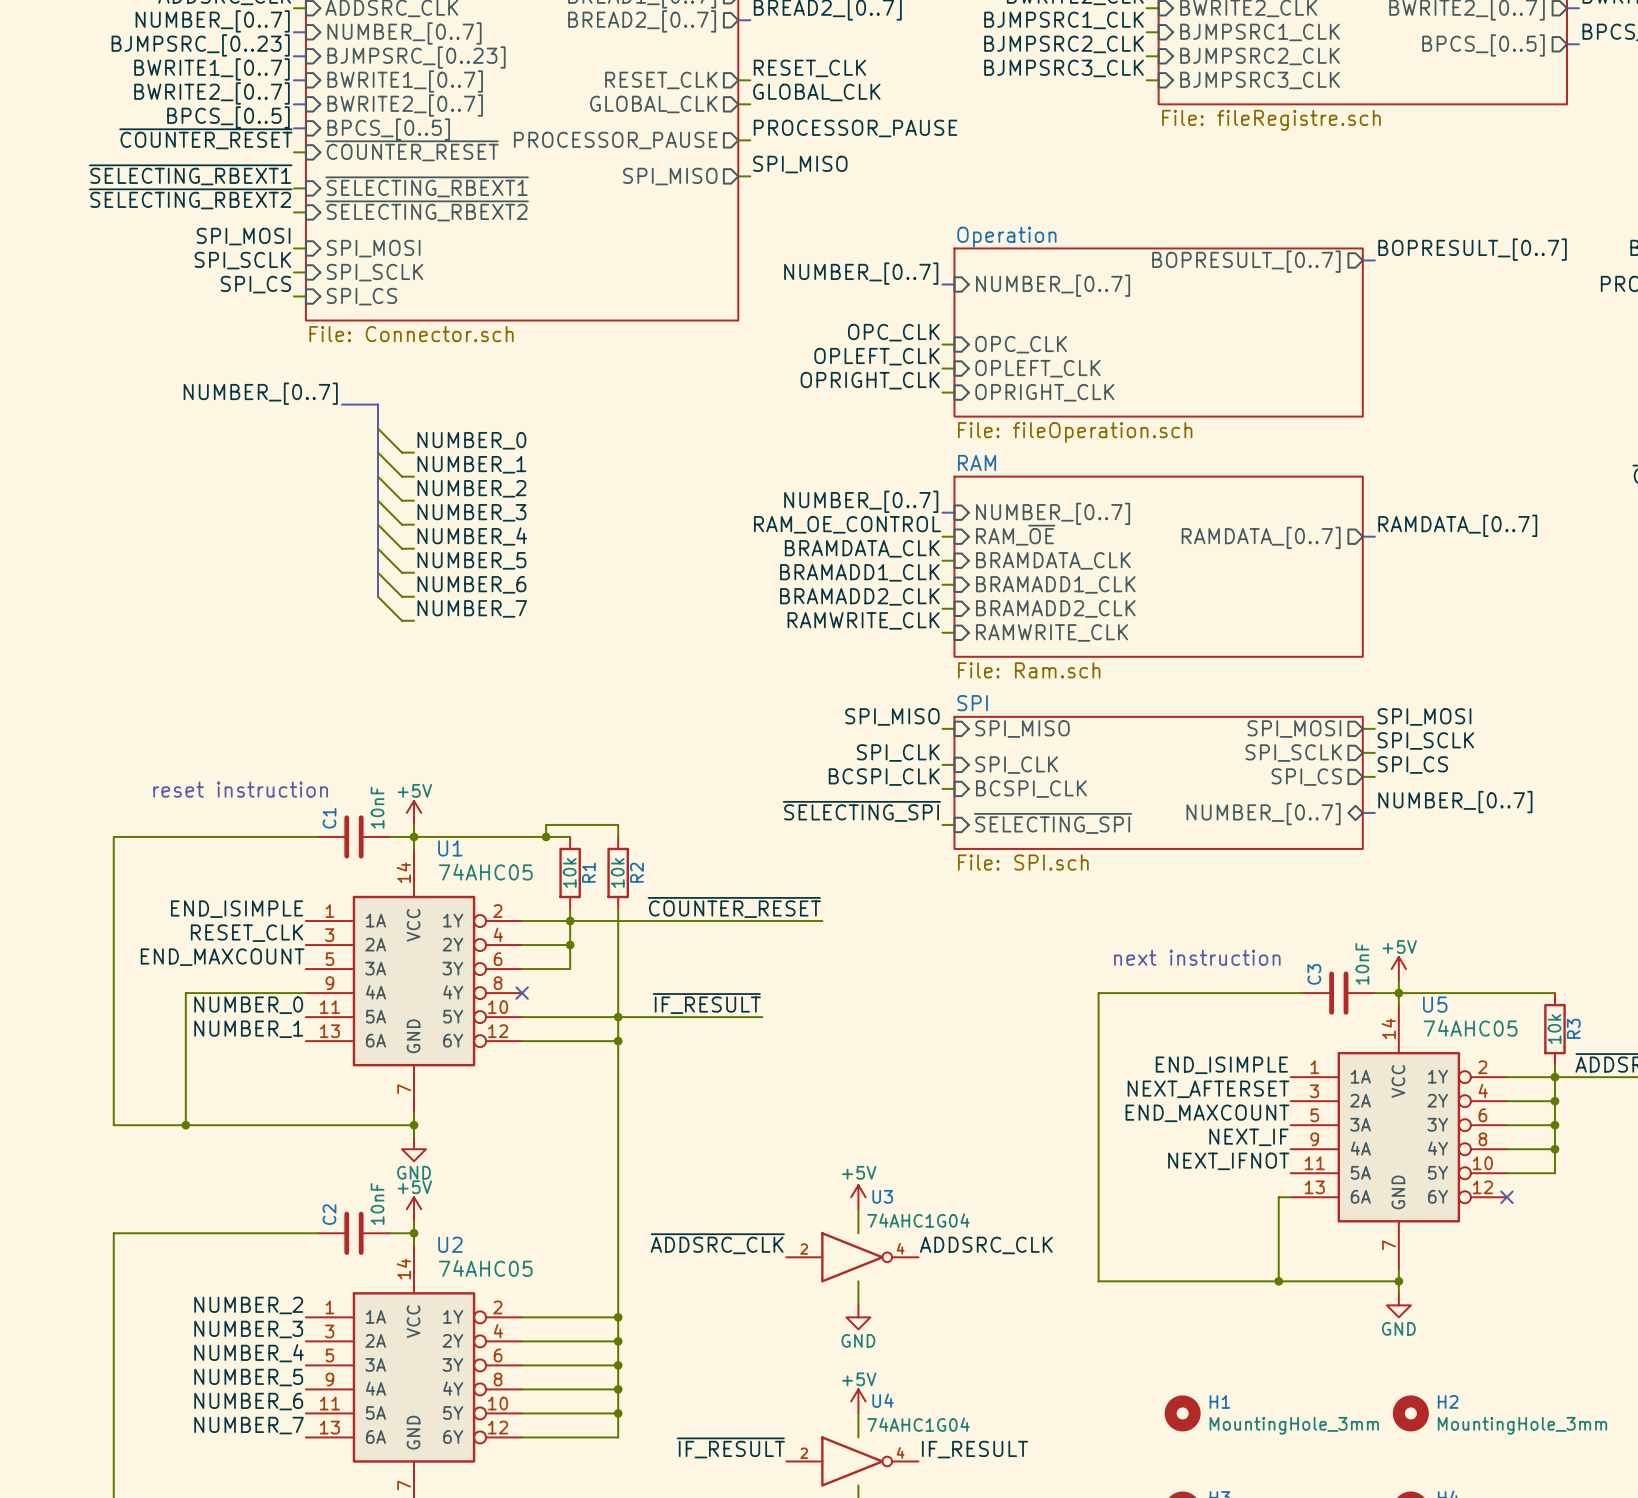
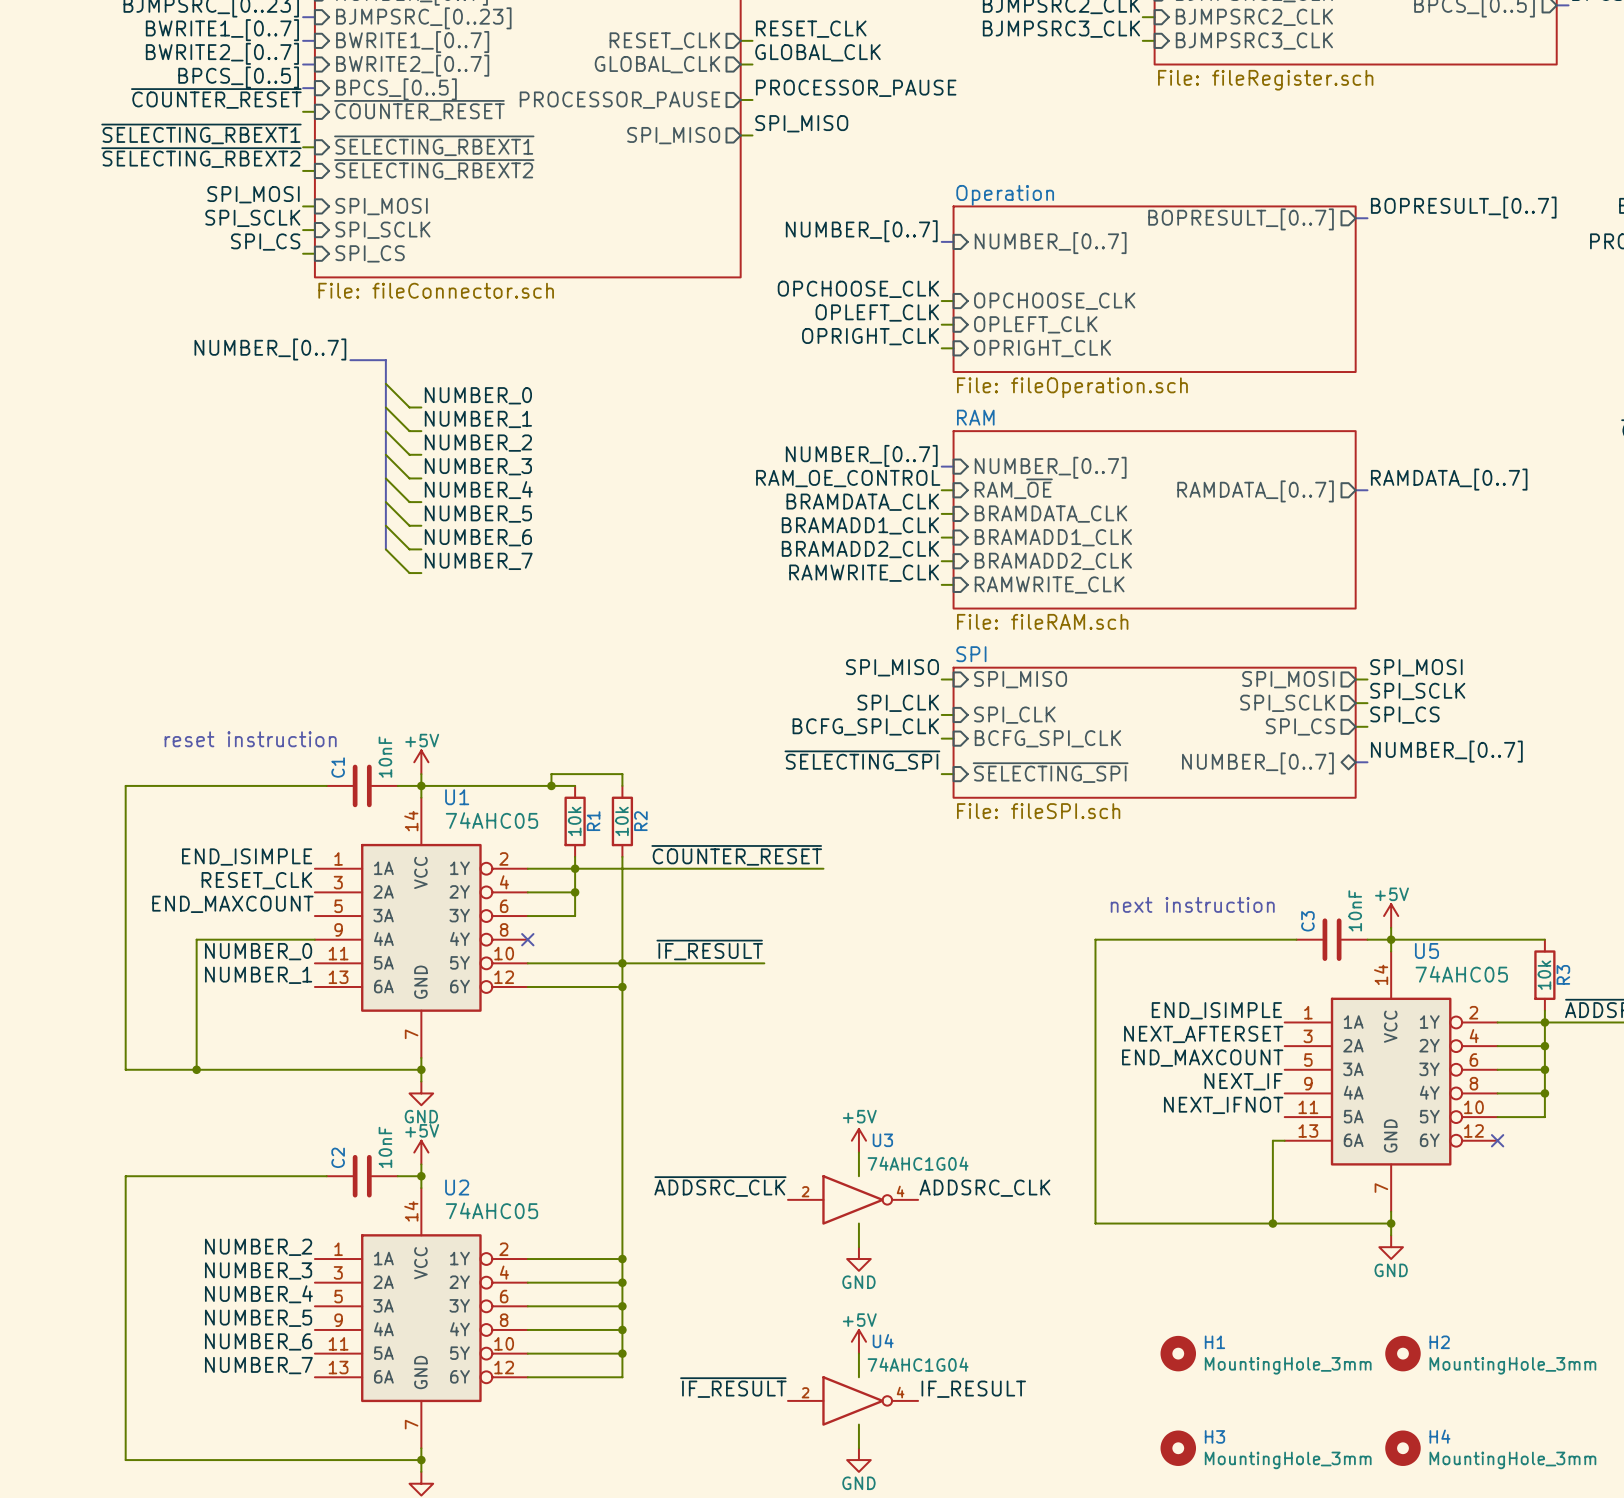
sheet value: File: fileRegistre.sch (1271, 120) -> File: fileRegister.sch (1265, 80)
label: OPC_CLK (893, 332) -> OPCHOOSE_CLK (858, 289)
sheet value: File: Connector.sch (411, 334) -> File: fileConnector.sch (436, 290)
sheet pin: OPC_CLK (1021, 344) -> OPCHOOSE_CLK (1054, 301)
sheet RAM value: File: Ram.sch (1029, 670) -> File: fileRAM.sch (1042, 621)
label: BCSPI_CLK (884, 777) -> BCFG_SPI_CLK (865, 726)
sheet pin: BCSPI_CLK (1031, 789) -> BCFG_SPI_CLK (1047, 738)
sheet SPI value: File: SPI.sch (1023, 862) -> File: fileSPI.sch (1038, 811)

